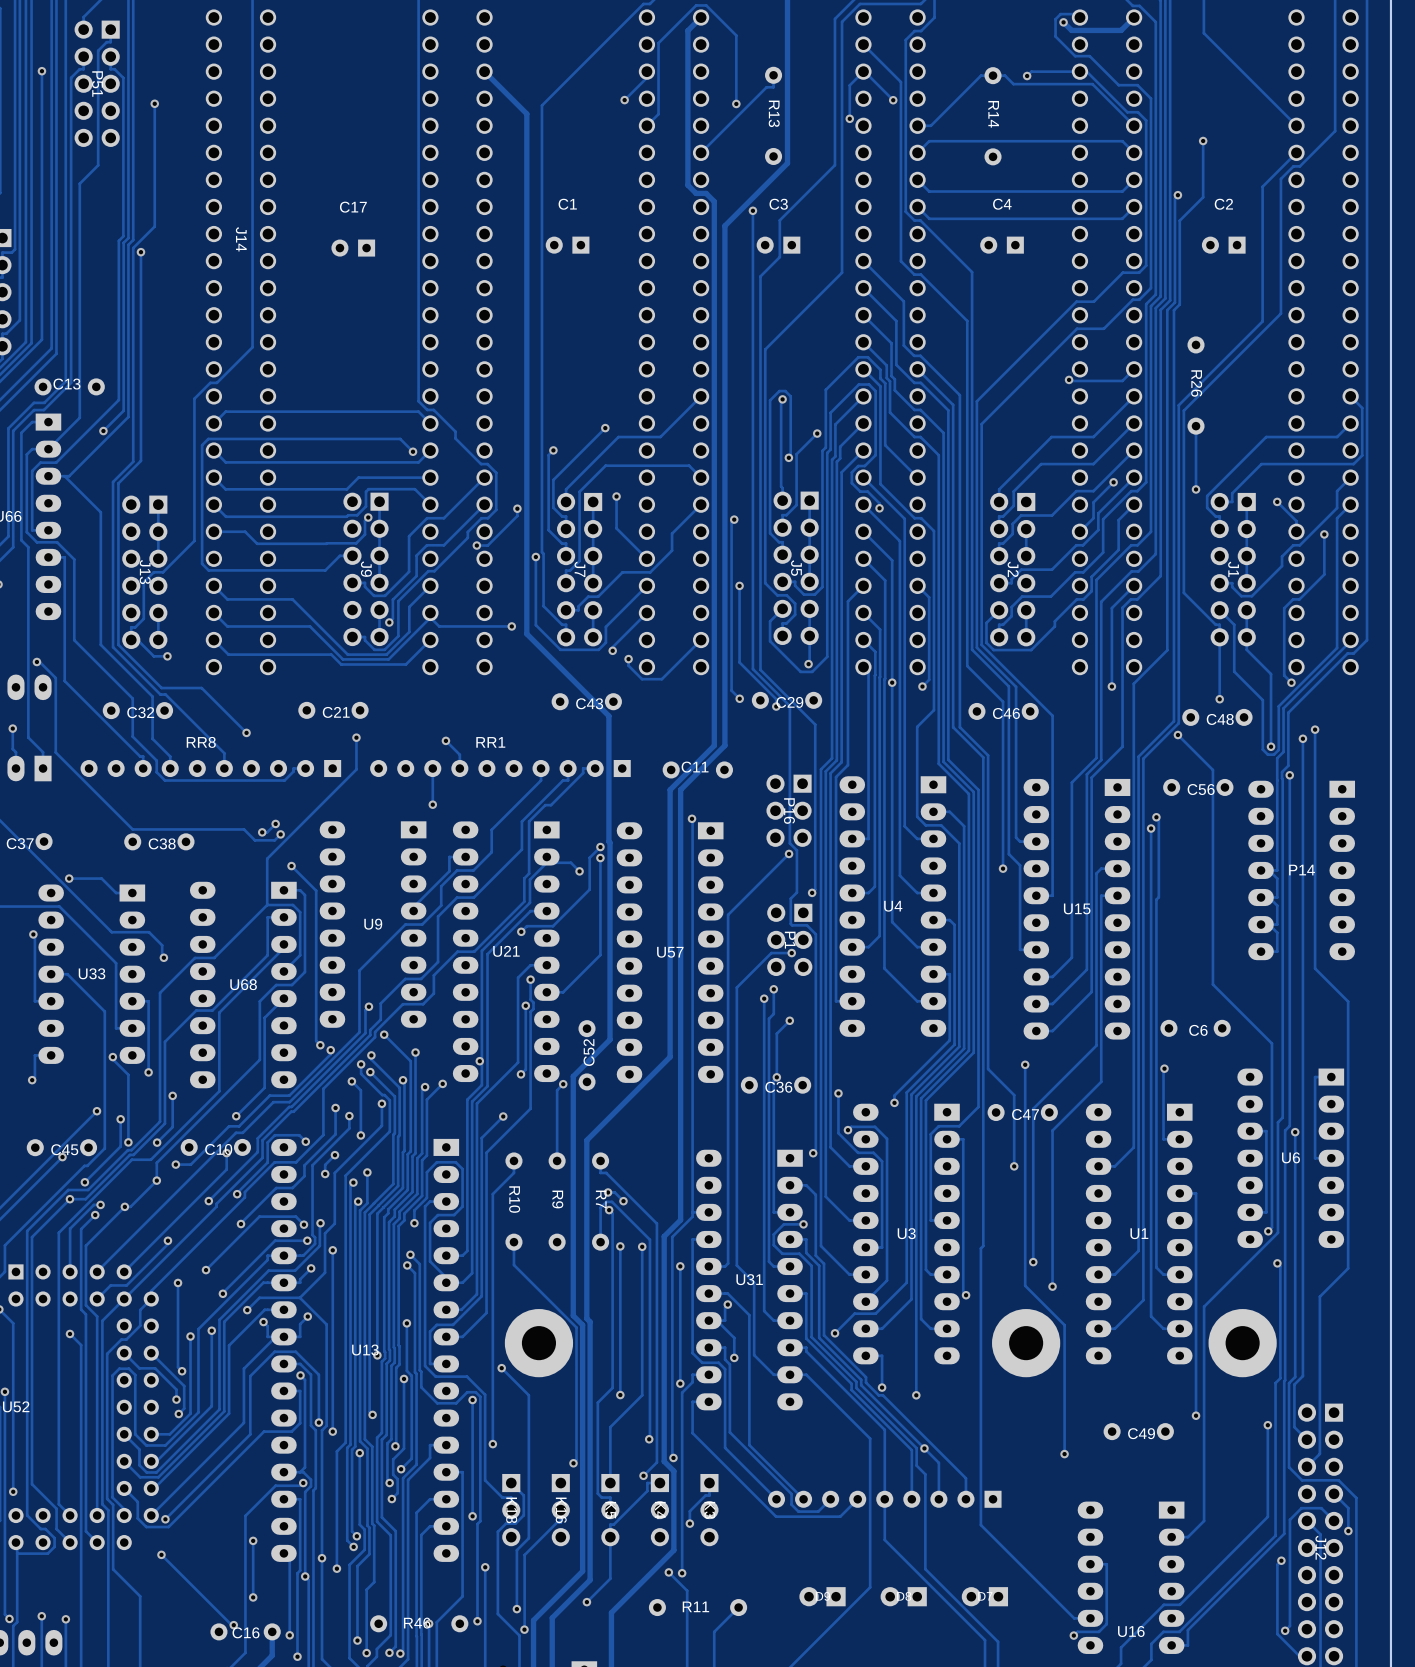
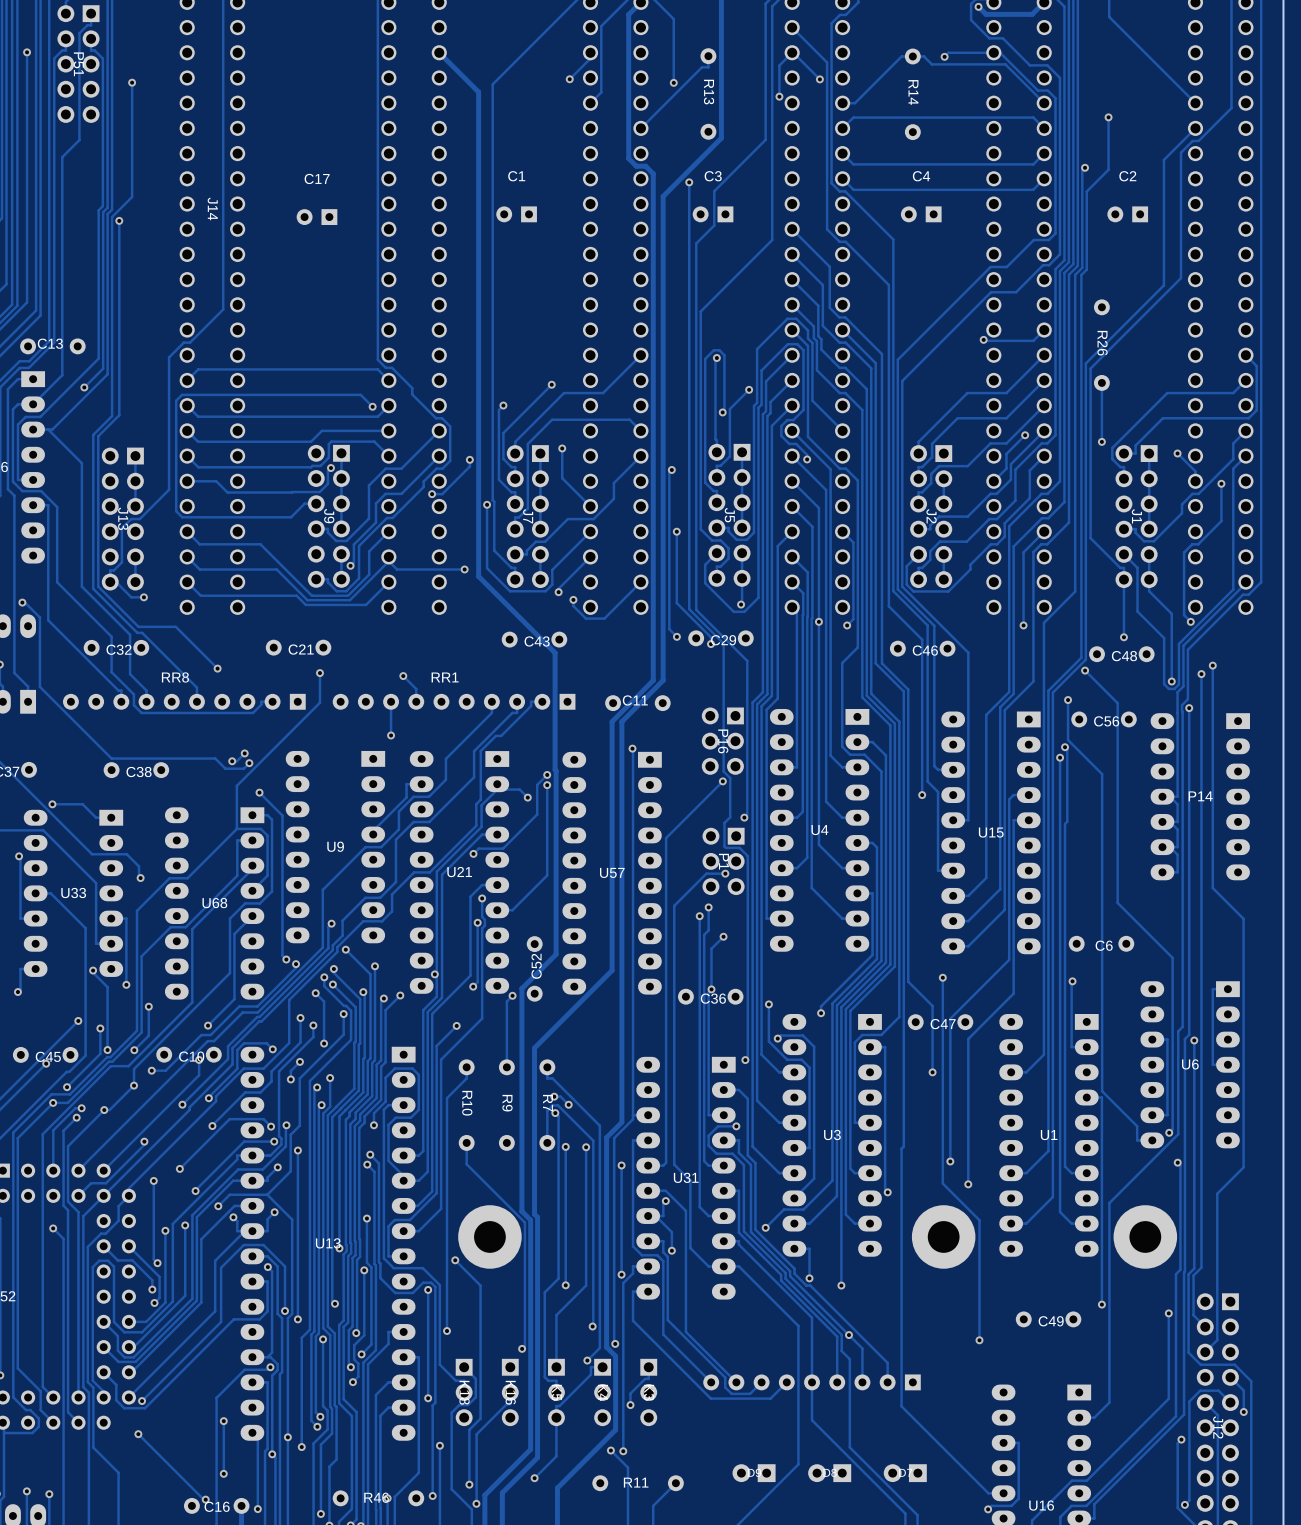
track: none -> (1068, 700) (1068, 740) (1102, 774) (1102, 1091) (1137, 1126) (1137, 1140) (1152, 1140)
via: none -> (1068, 700)

